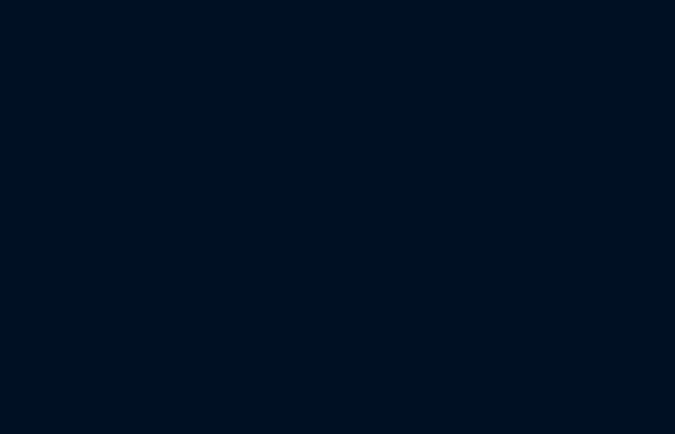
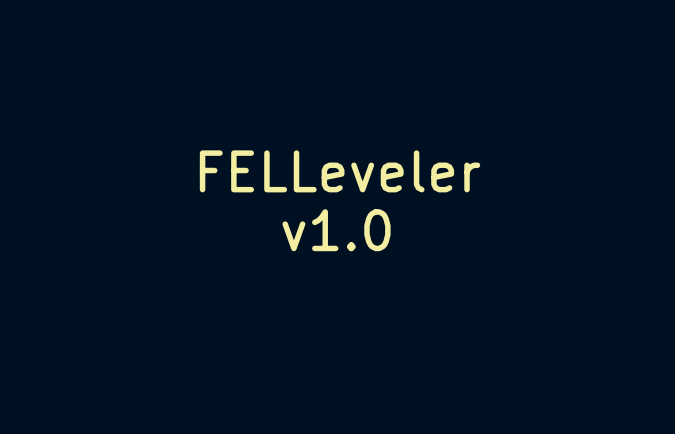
text: none -> FELLeveler (340, 171)
text: none -> v1.0 (336, 230)

